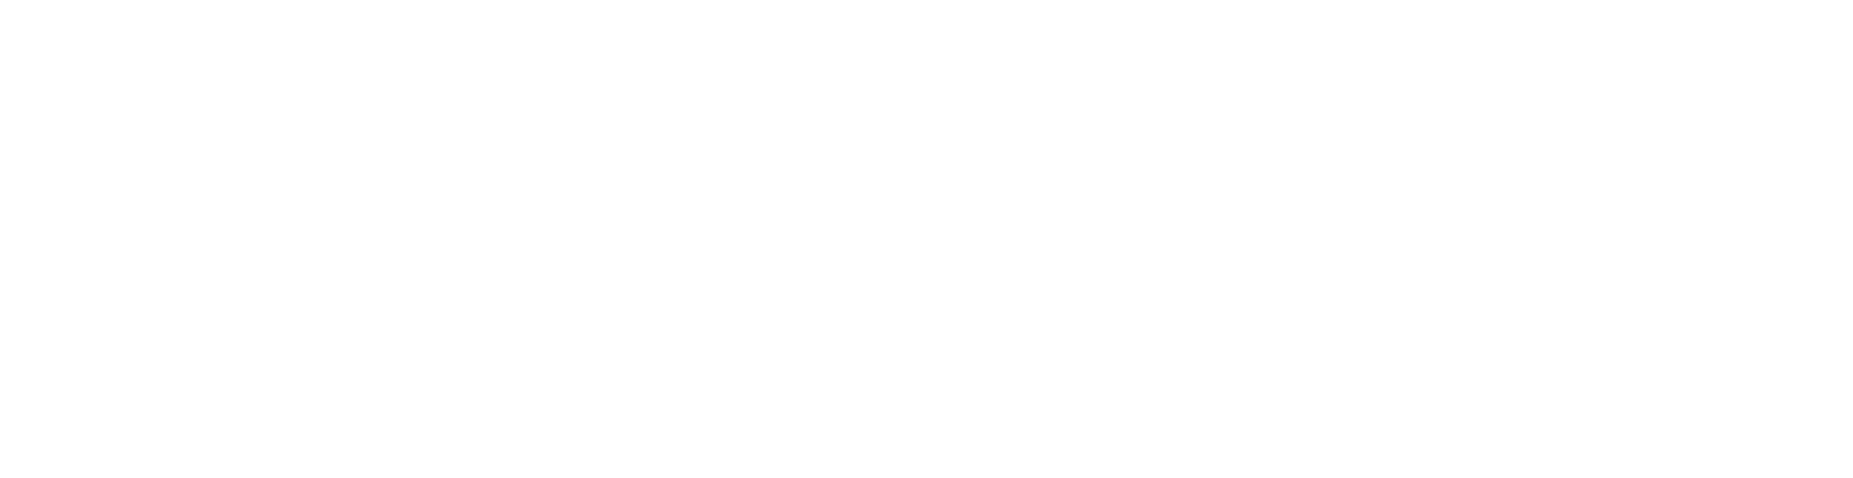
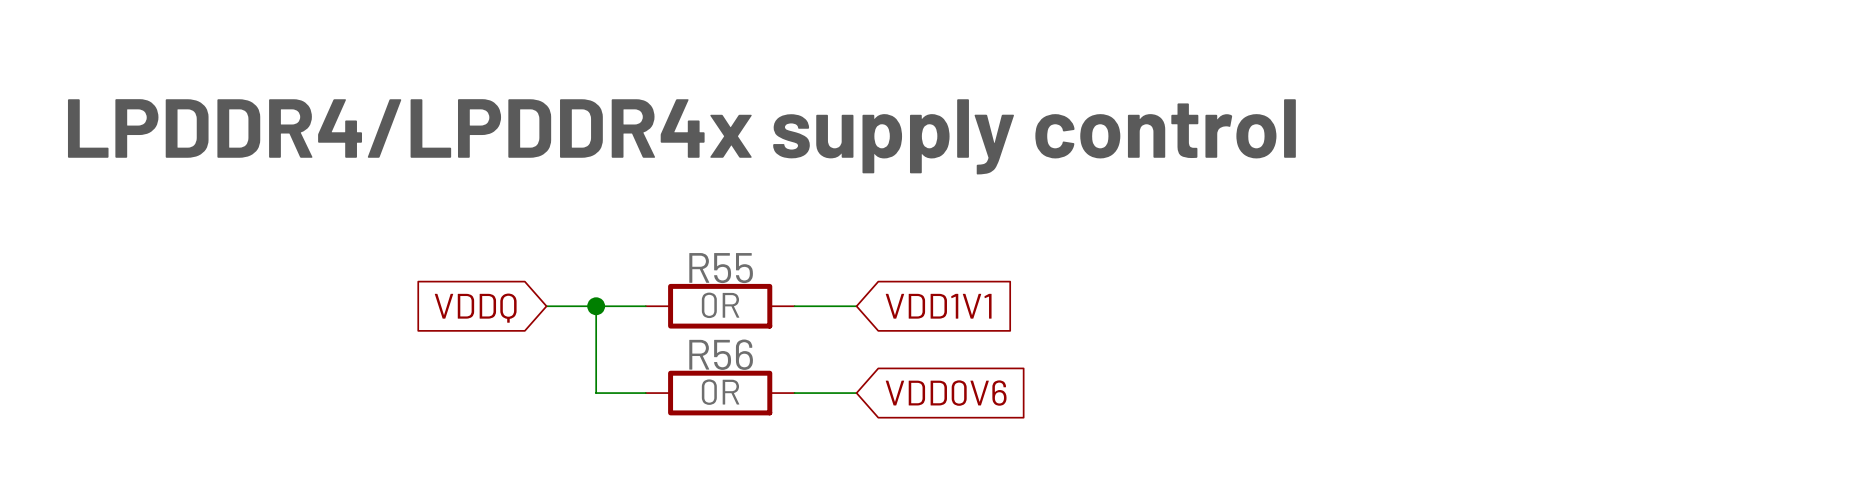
text: none -> LPDDR4/LPDDR4x supply control (681, 136)
wire: none -> (546, 306) (645, 306)
wire: none -> (596, 306) (596, 393) (645, 393)
junction: none -> (596, 306)
R55: none -> (720, 306)
wire: none -> (794, 306) (856, 306)
global label: none -> VDD1V1 (938, 306)
global label: none -> VDDQ (475, 308)
R56: none -> (720, 393)
wire: none -> (794, 393) (856, 393)
global label: none -> VDD0V6 (946, 393)

